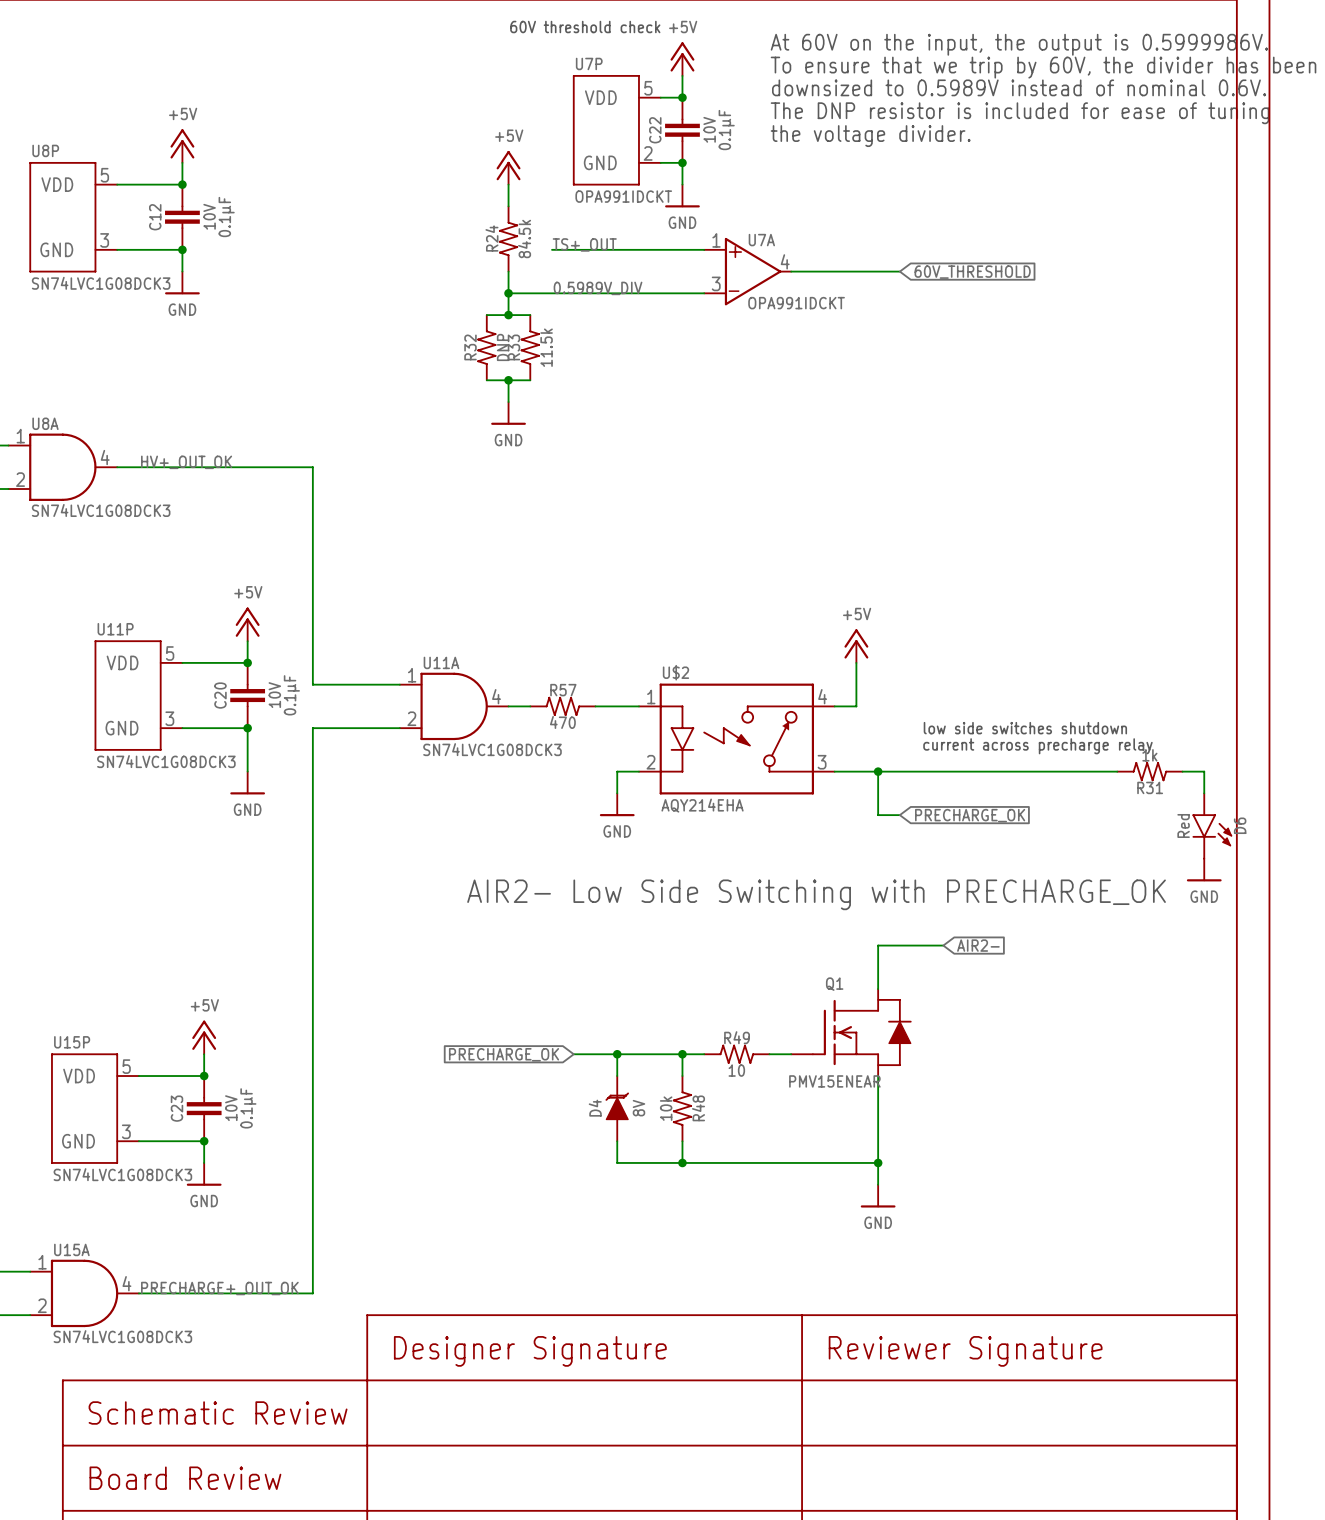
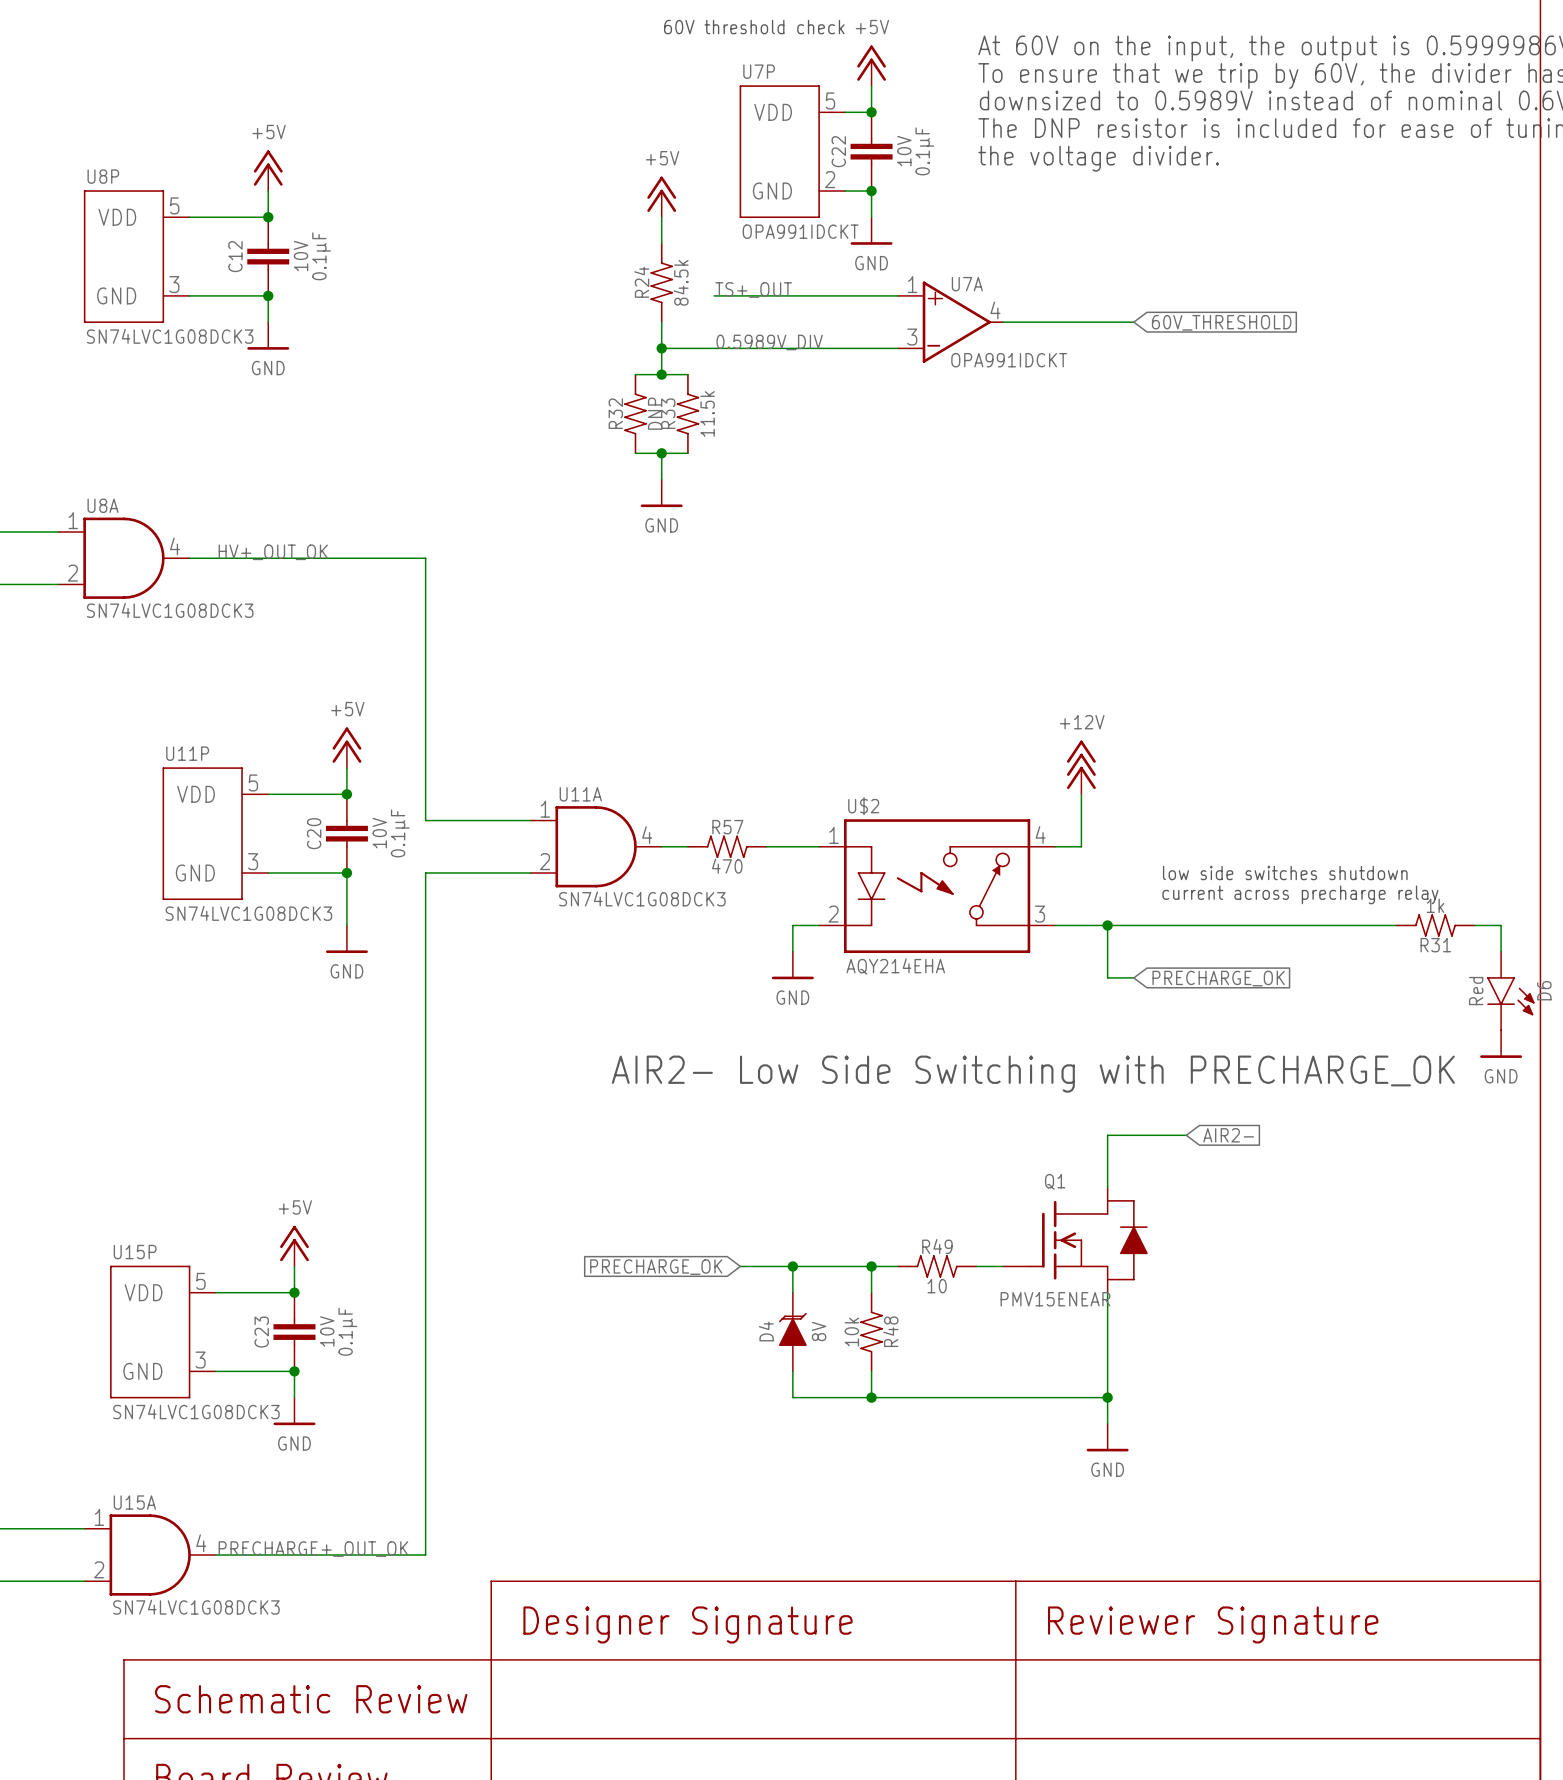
power symbol: +5V (856, 646) -> +12V (1081, 767)

